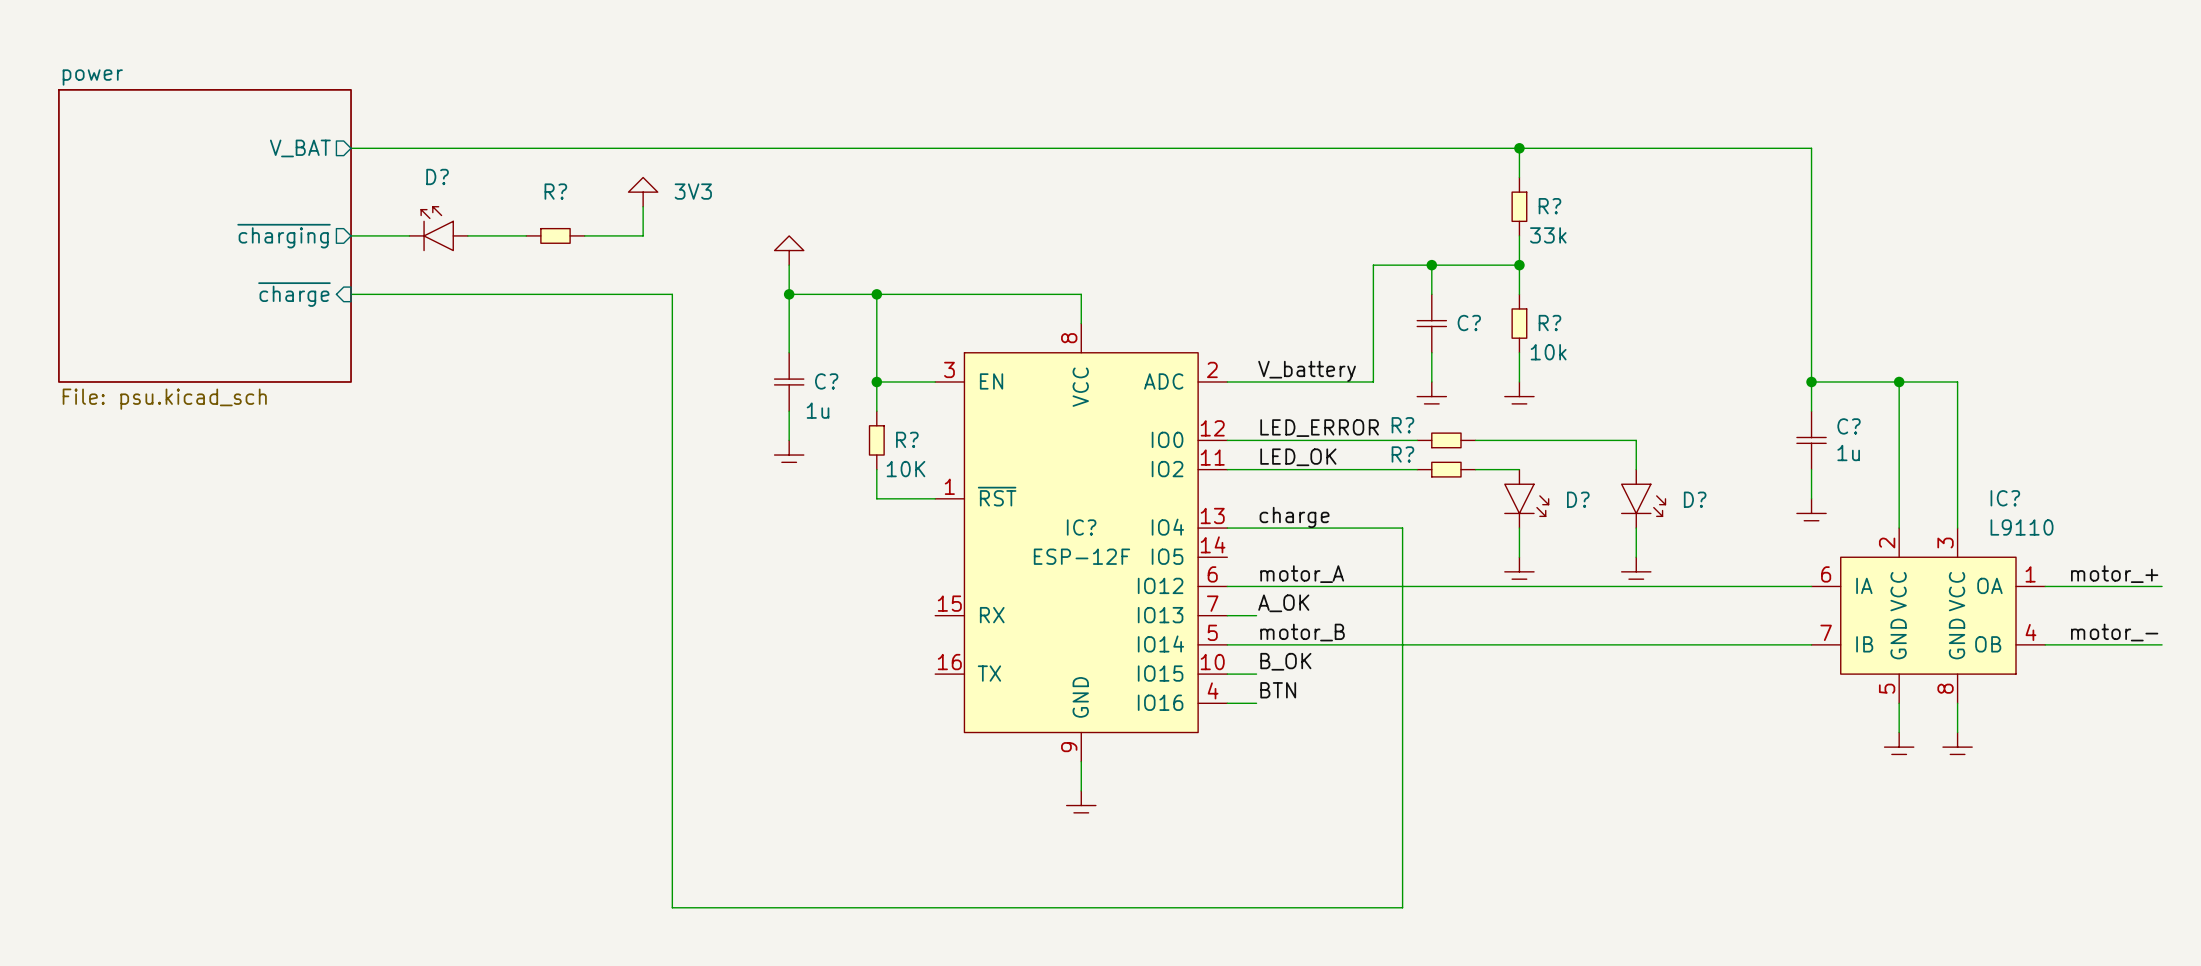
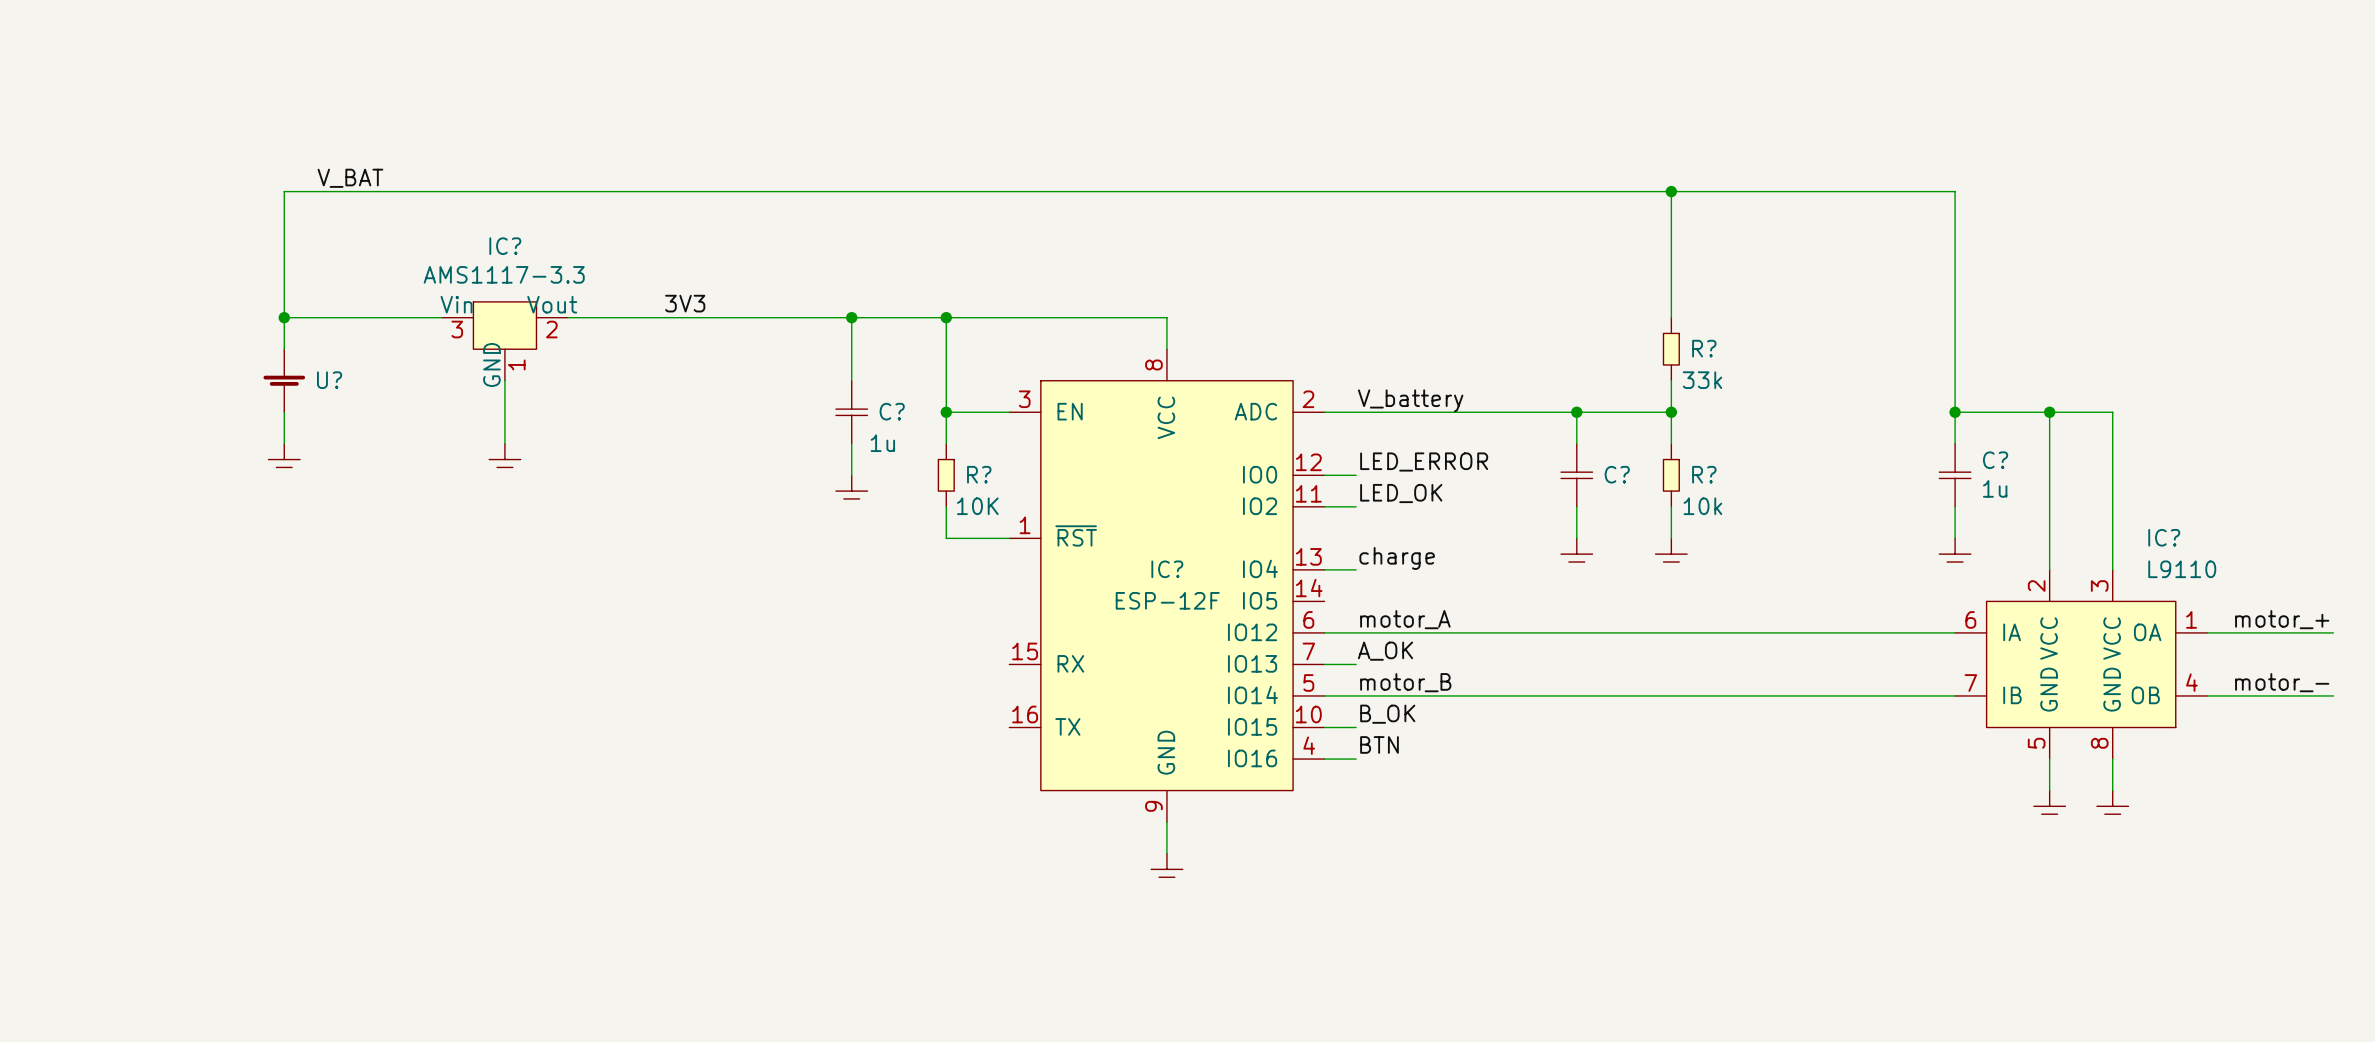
sheet pin: V_BAT (300, 148) -> none
wire: (351, 148) (1811, 148) (1811, 177) -> (284, 349) (284, 191) (1955, 191)
wire: (1519, 148) (1519, 177) -> none
junction position: (1519, 148) -> (1671, 191)
label: none -> V_BAT (350, 178)
wire: none -> (1671, 191) (1671, 317)
power symbol: 3V3 (643, 192) -> none
wire: (643, 206) (643, 235) (584, 235) -> none
R? position: (1519, 206) -> (1671, 349)
D?: (438, 228) -> none
sheet power: File: psu.kicad_sch (204, 235) -> none
wire: (351, 235) (409, 235) -> none
wire: (467, 235) (526, 235) -> none
R?: (555, 235) -> none
wire: (1519, 235) (1519, 294) -> (1671, 380) (1671, 443)
sheet pin: ~{charging} (284, 236) -> none
power symbol: (789, 250) -> none
wire: (789, 265) (789, 294) -> (725, 317) (851, 317)
wire: (1431, 265) (1431, 294) -> (1576, 412) (1576, 443)
junction: (1431, 265) -> none
wire: (1519, 265) (1373, 265) (1373, 381) -> (1671, 412) (1482, 412)
junction: (1519, 265) -> none
label: none -> 3V3 (685, 303)
wire: none -> (284, 317) (378, 317)
junction: none -> (284, 317)
sheet pin: ~{charge} (294, 294) -> none
wire: (672, 294) (672, 907) (1402, 907) (1402, 528) (1256, 528) -> none
IC?: none -> AMS1117-3.3 (504, 341)
C? position: (1431, 323) -> (1576, 475)
R? position: (1519, 323) -> (1671, 475)
U?: none -> (284, 380)
wire: none -> (504, 380) (504, 443)
wire: (1431, 352) (1431, 381) -> (1576, 506) (1576, 538)
wire: (1519, 352) (1519, 381) -> (1671, 506) (1671, 538)
wire: none -> (284, 412) (284, 443)
junction: none -> (1576, 412)
junction: none -> (1671, 412)
power symbol: (1431, 396) -> none
power symbol: (1519, 396) -> none
power symbol: none -> (284, 459)
power symbol: none -> (504, 459)
wire: (1256, 440) (1417, 440) -> none
R?: (1446, 440) -> none
wire: (1475, 440) (1636, 440) (1636, 469) -> none
wire: (1256, 469) (1417, 469) -> none
R?: (1446, 469) -> none
wire: (1475, 469) (1519, 469) -> none
D?: (1526, 498) -> none
D?: (1643, 498) -> none
power symbol: none -> (1576, 554)
power symbol: none -> (1671, 554)
wire: (1519, 528) (1519, 557) -> none
wire: (1636, 528) (1636, 557) -> none
power symbol: (1519, 571) -> none
power symbol: (1636, 571) -> none

